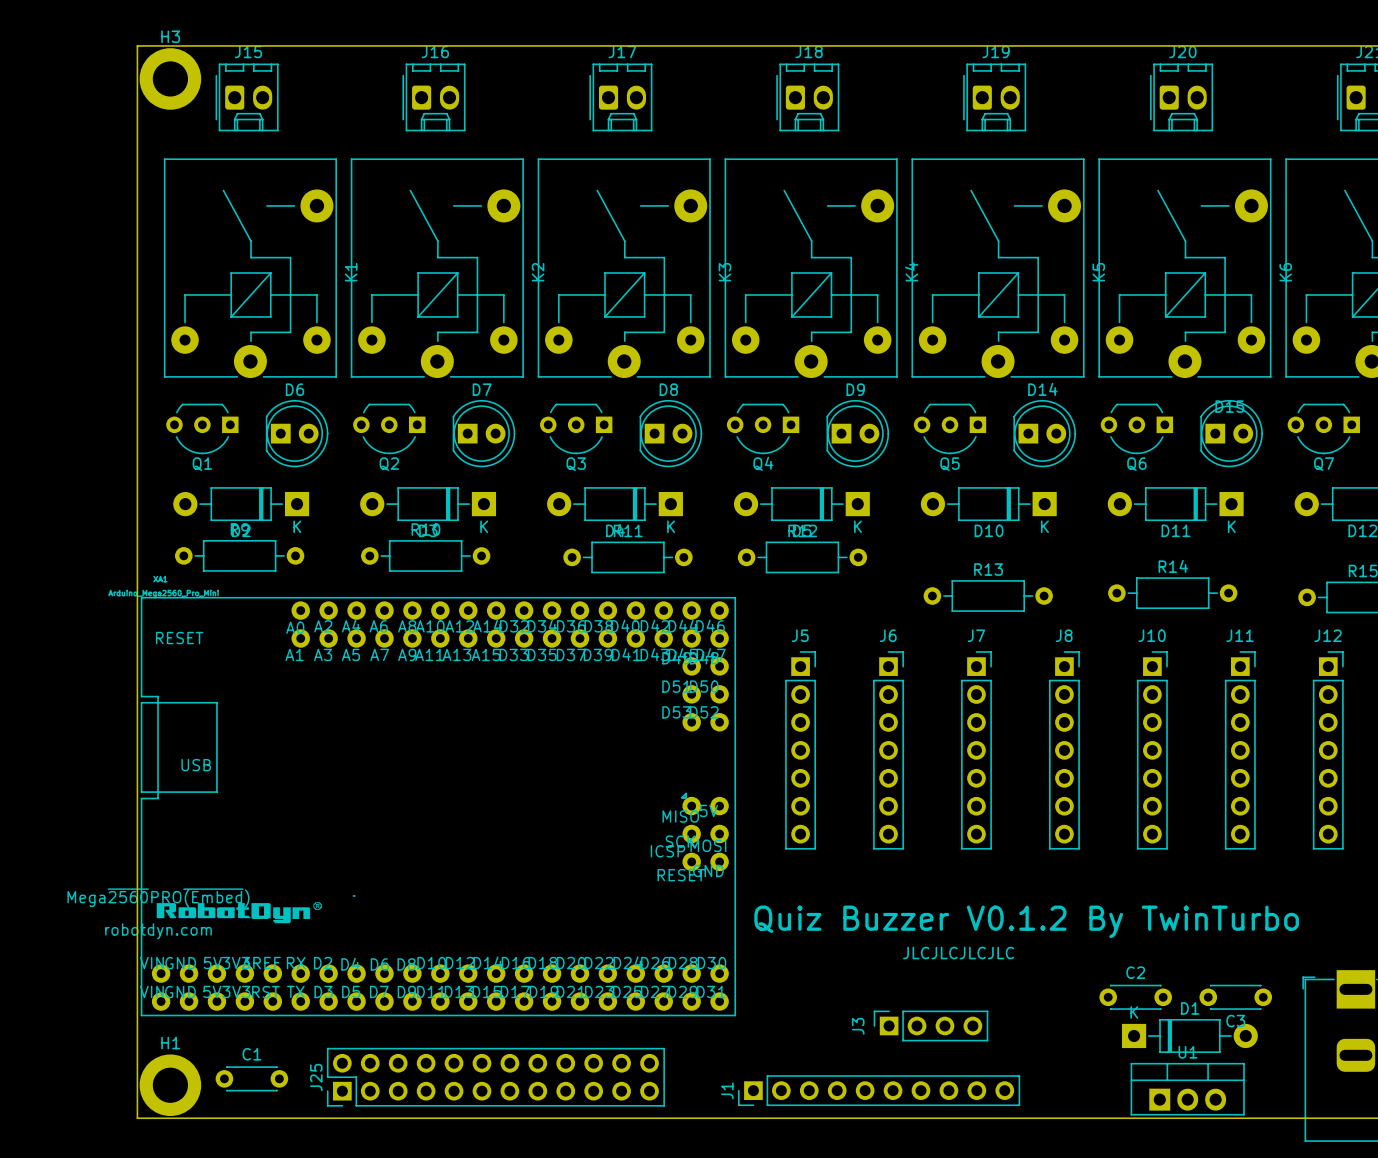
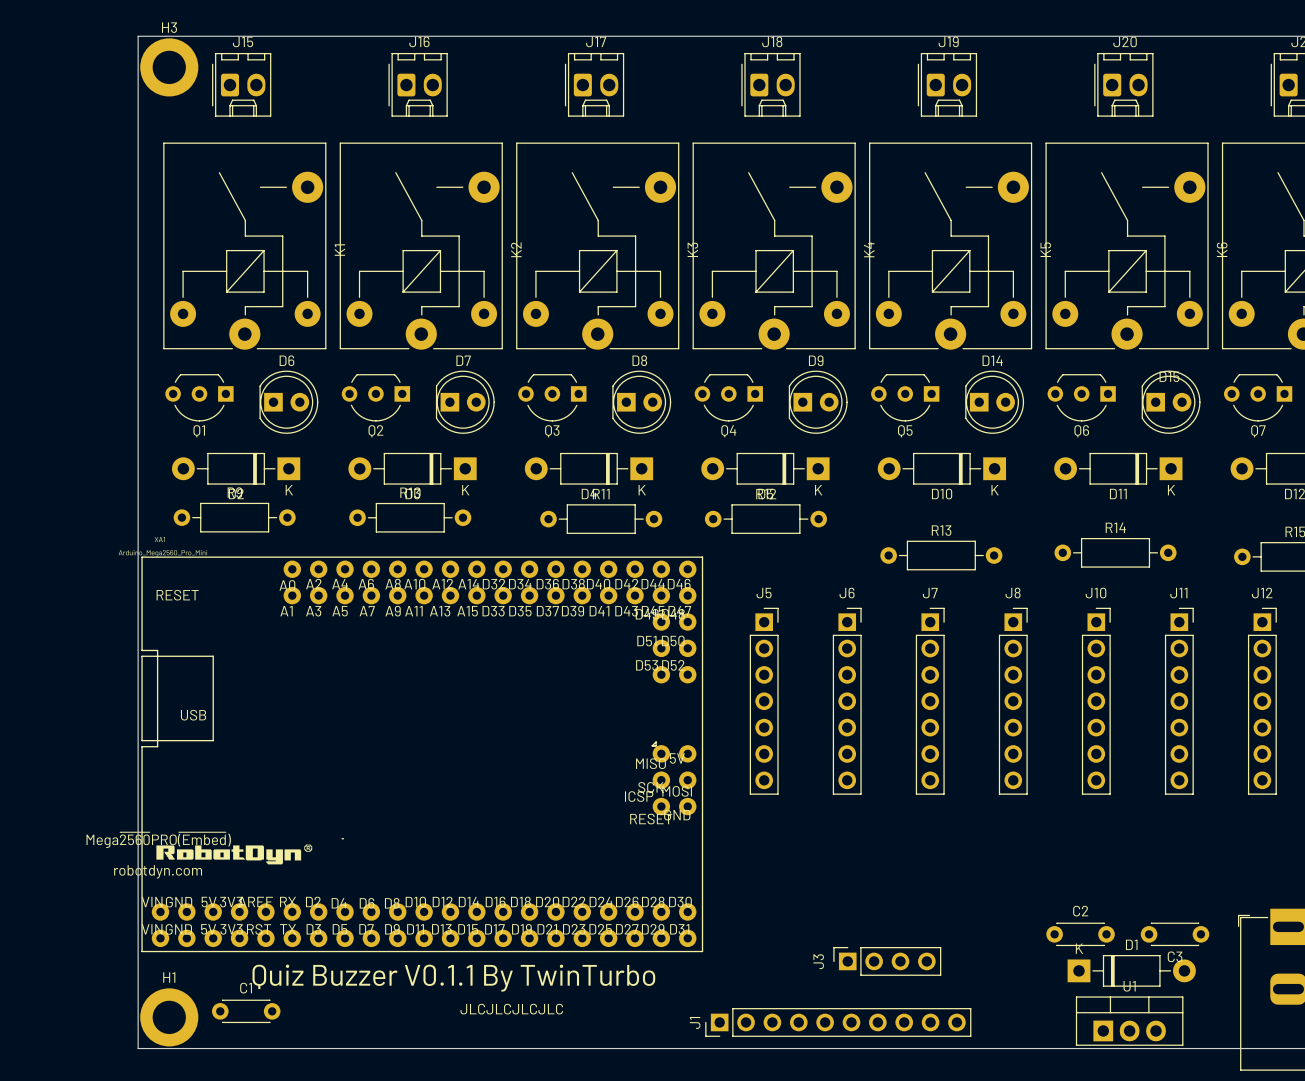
text: Quiz Buzzer V0.1.2 By TwinTurbo (1026, 921) -> none
text: JLCJLCJLCJLC (958, 953) -> none
text: none -> Quiz Buzzer V0.1.1 By TwinTurbo (453, 978)
text: none -> JLCJLCJLCJLC (511, 1009)
J25: (495, 1077) -> none

